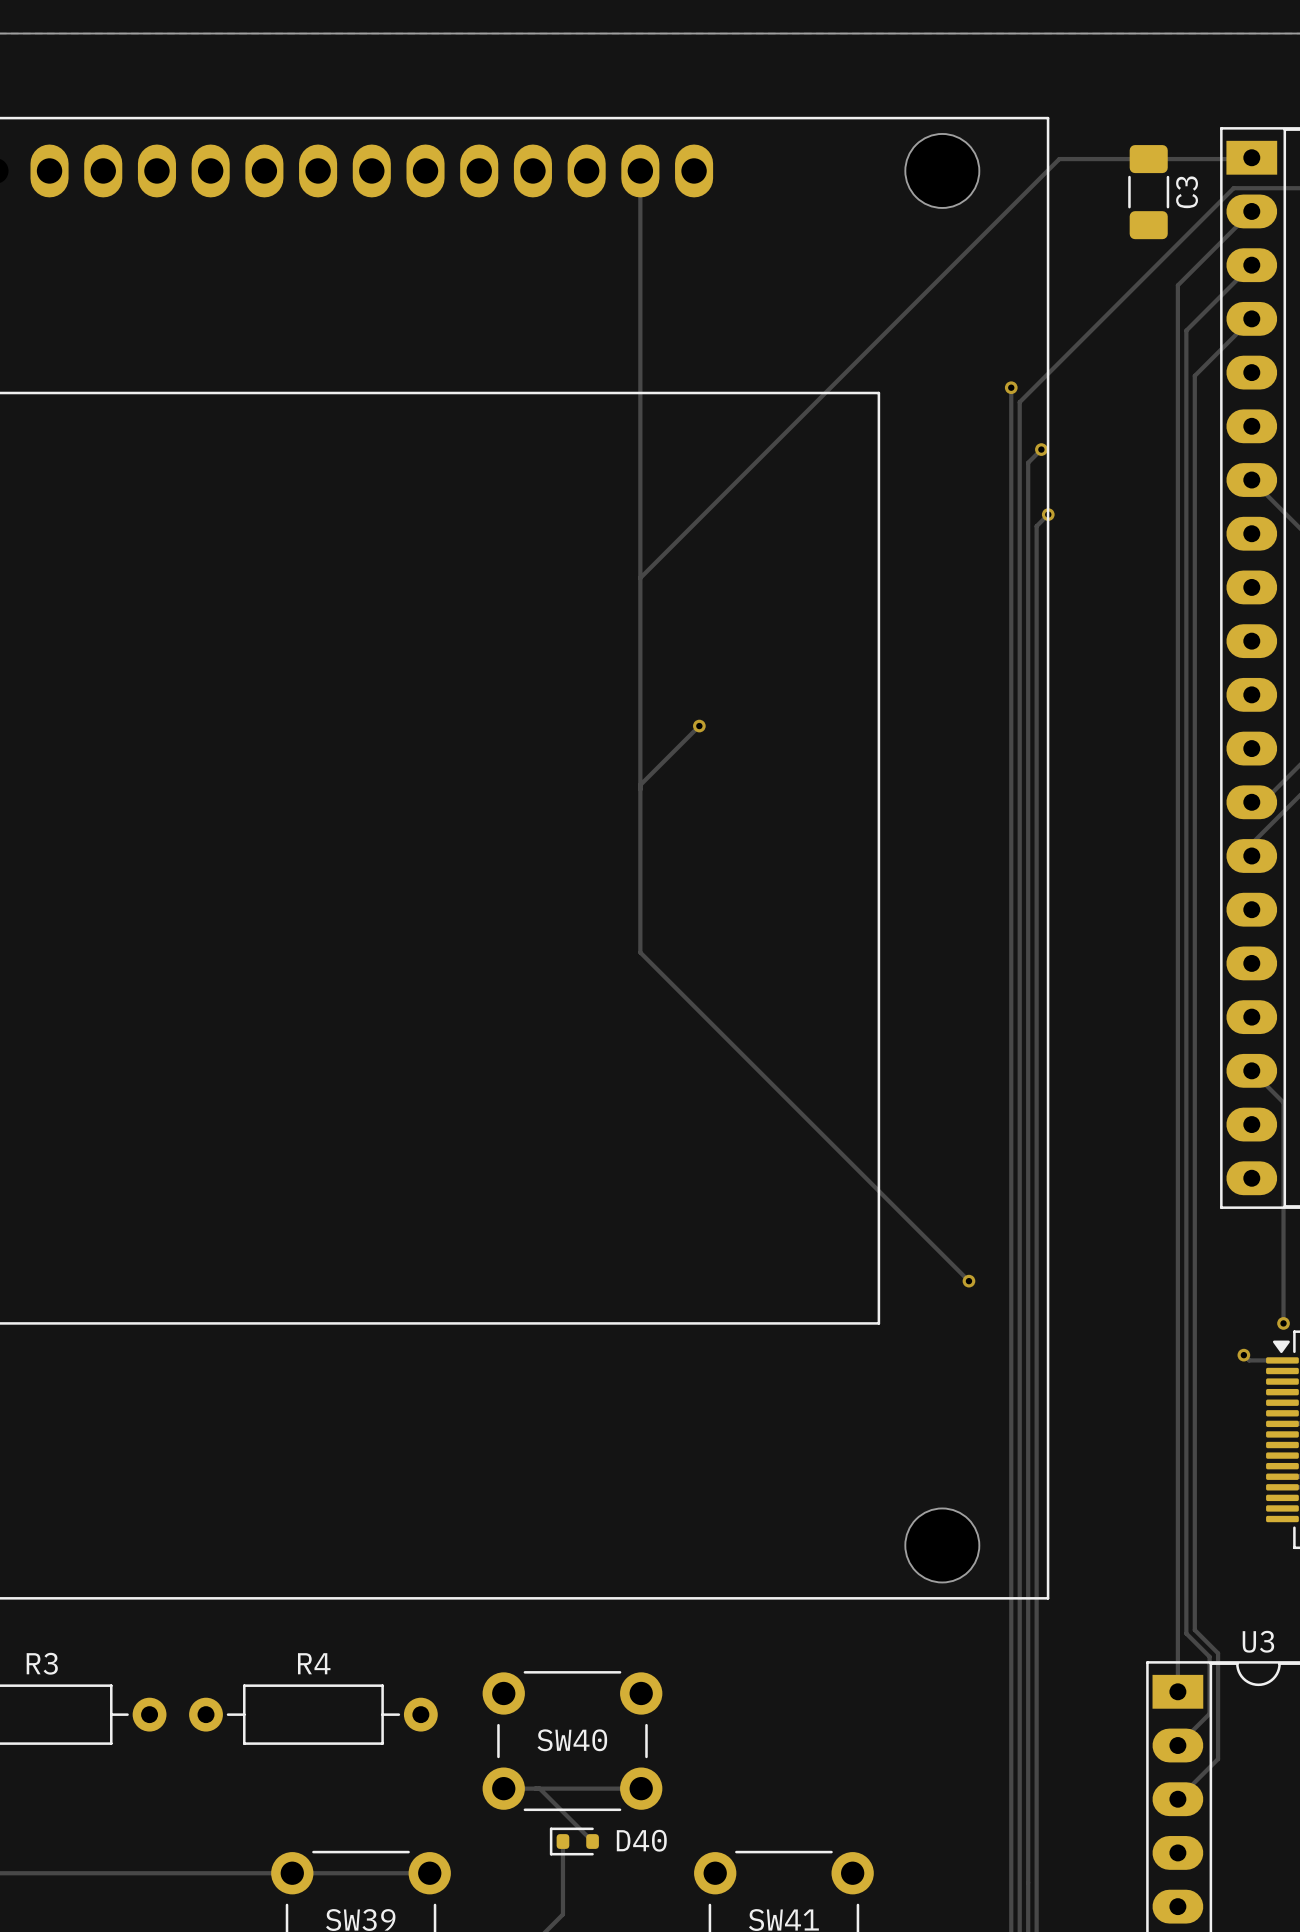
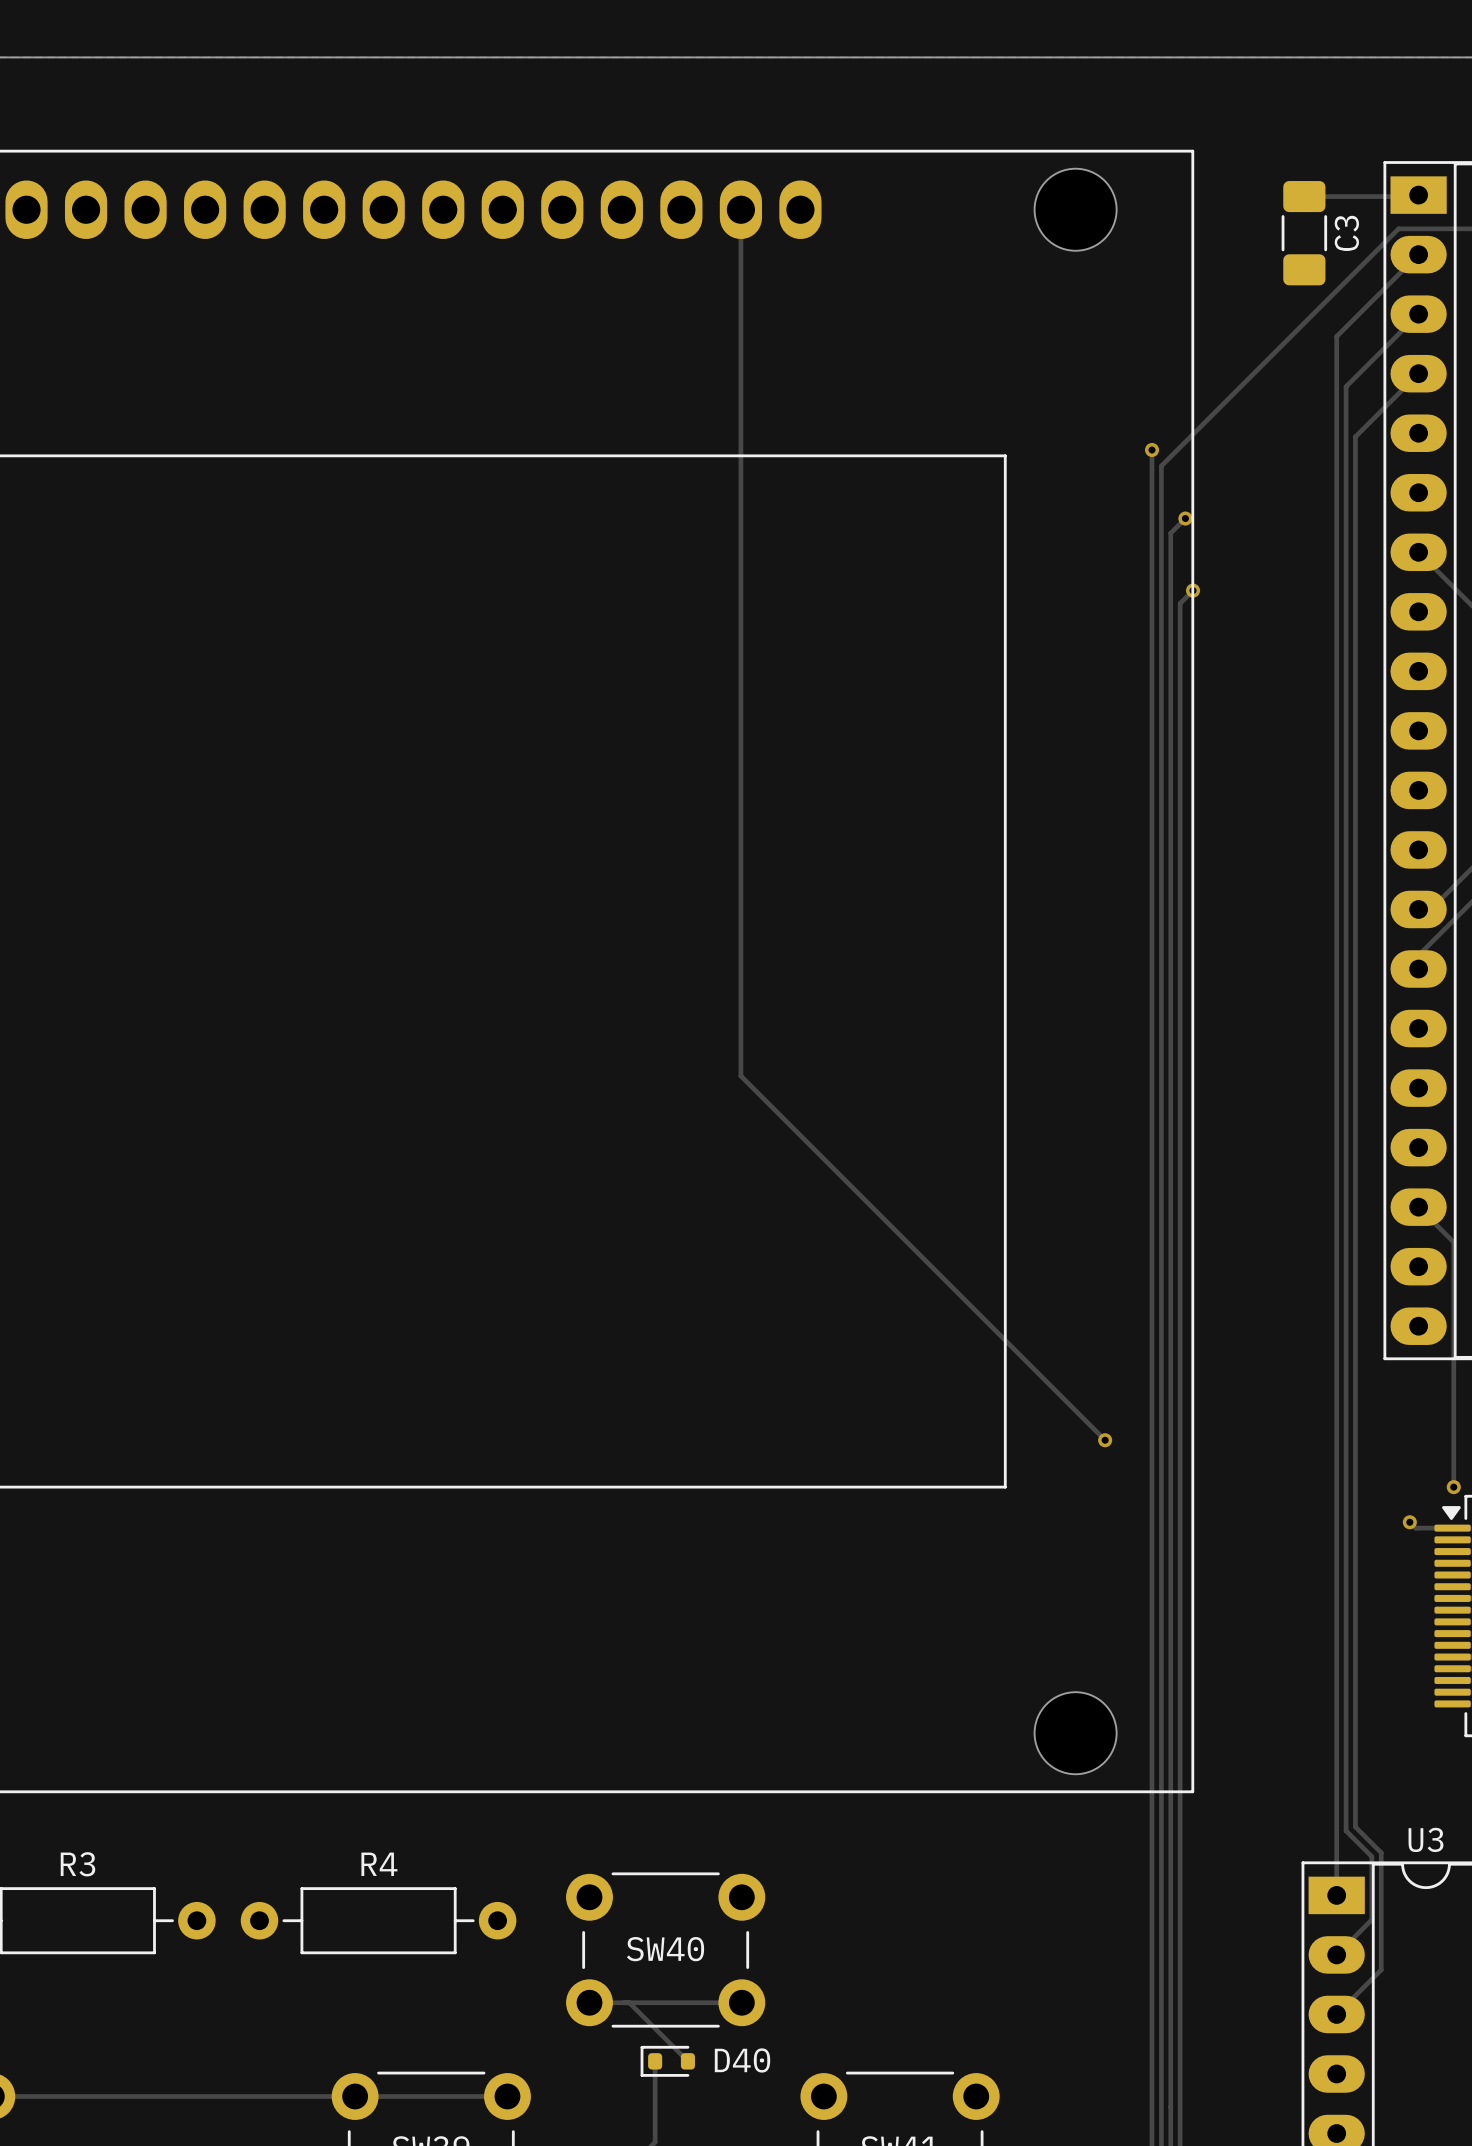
track: (1148, 159) (1059, 159) (640, 578) -> none
track: (699, 726) (640, 785) -> none
via: (699, 726) -> none

